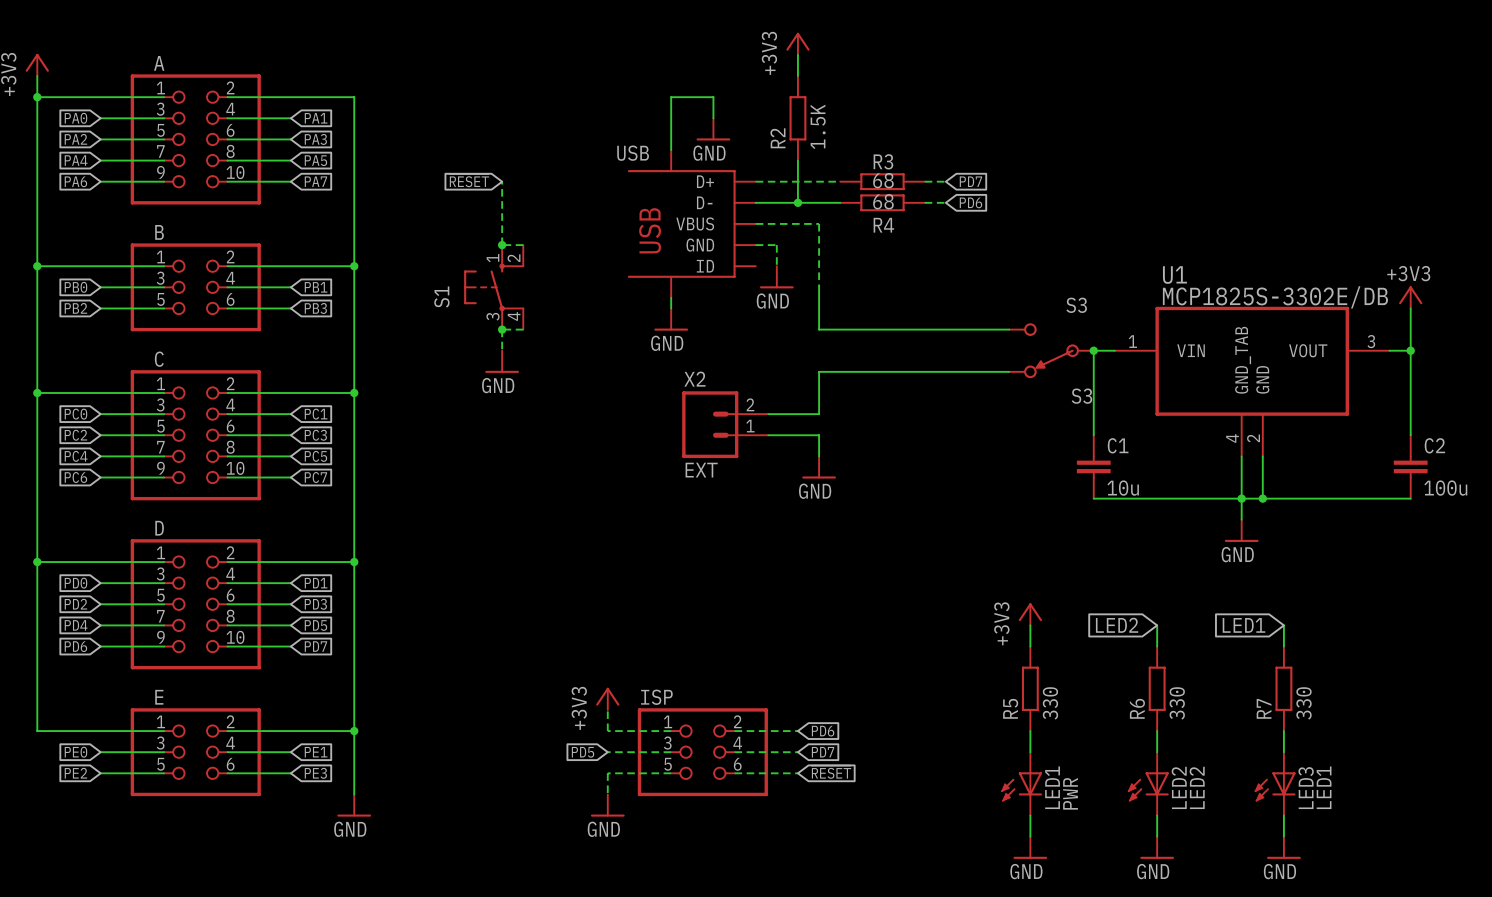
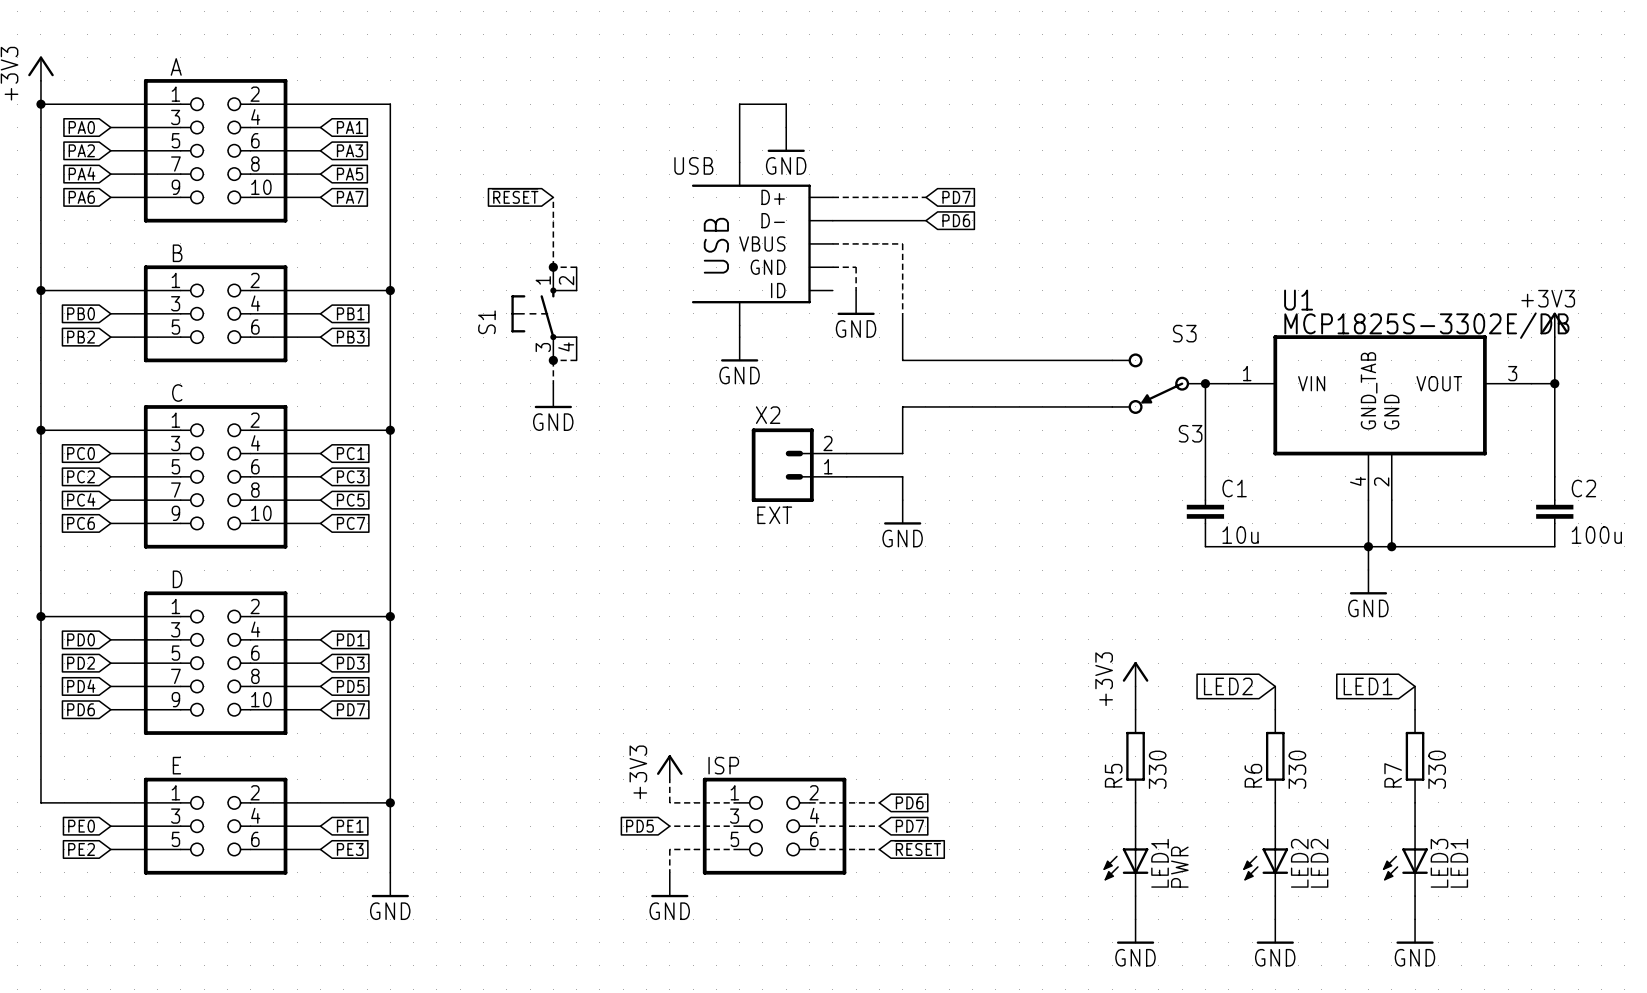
power symbol: +3V3 (797, 43) -> none
wire: (797, 54) (797, 76) -> none
R2: 1.5K (797, 118) -> none
wire: (797, 160) (797, 202) -> none
R3: 68 (882, 181) -> none
wire: (924, 181) (945, 181) -> none
global label position: PD7 (970, 181) -> PD7 (956, 197)
junction: (797, 202) -> none
R4: 68 (882, 202) -> none
wire: (924, 202) (945, 202) -> none
global label position: PD6 (970, 202) -> PD6 (956, 220)

